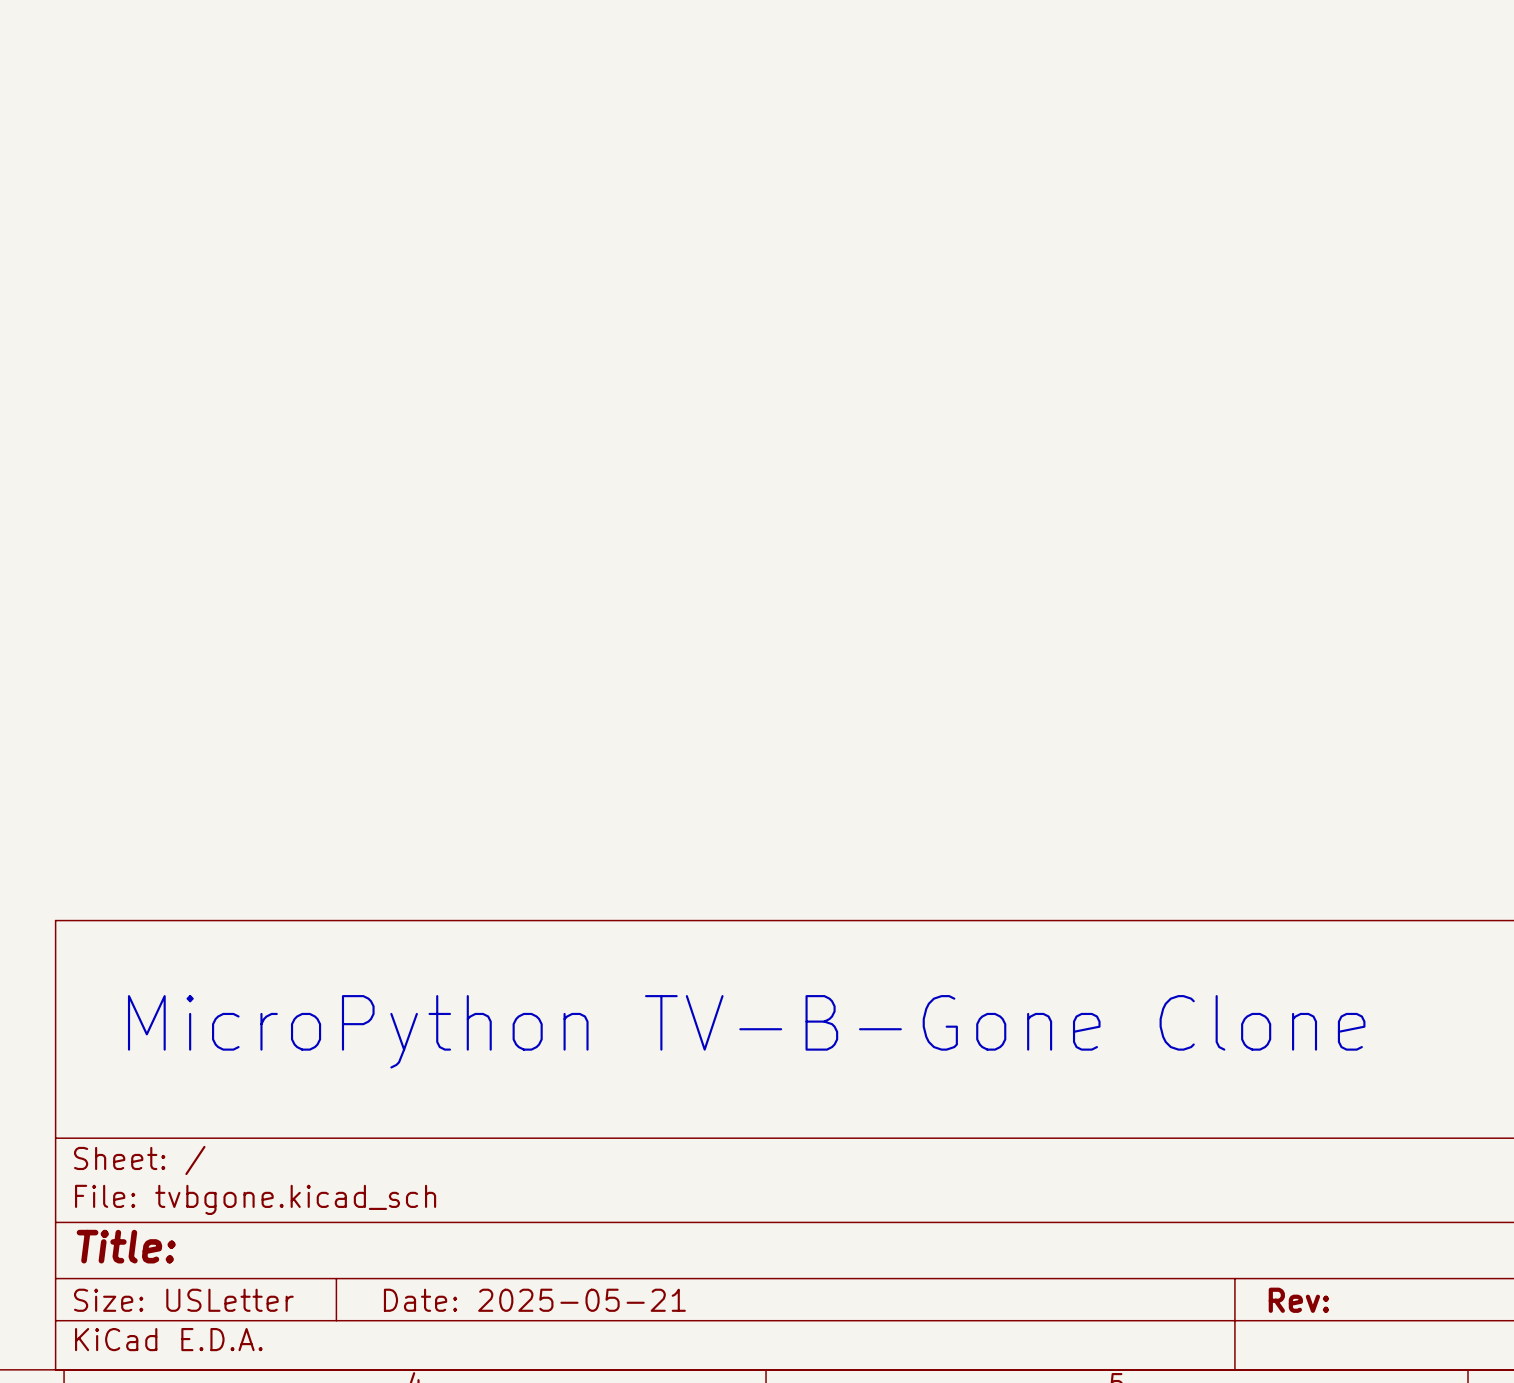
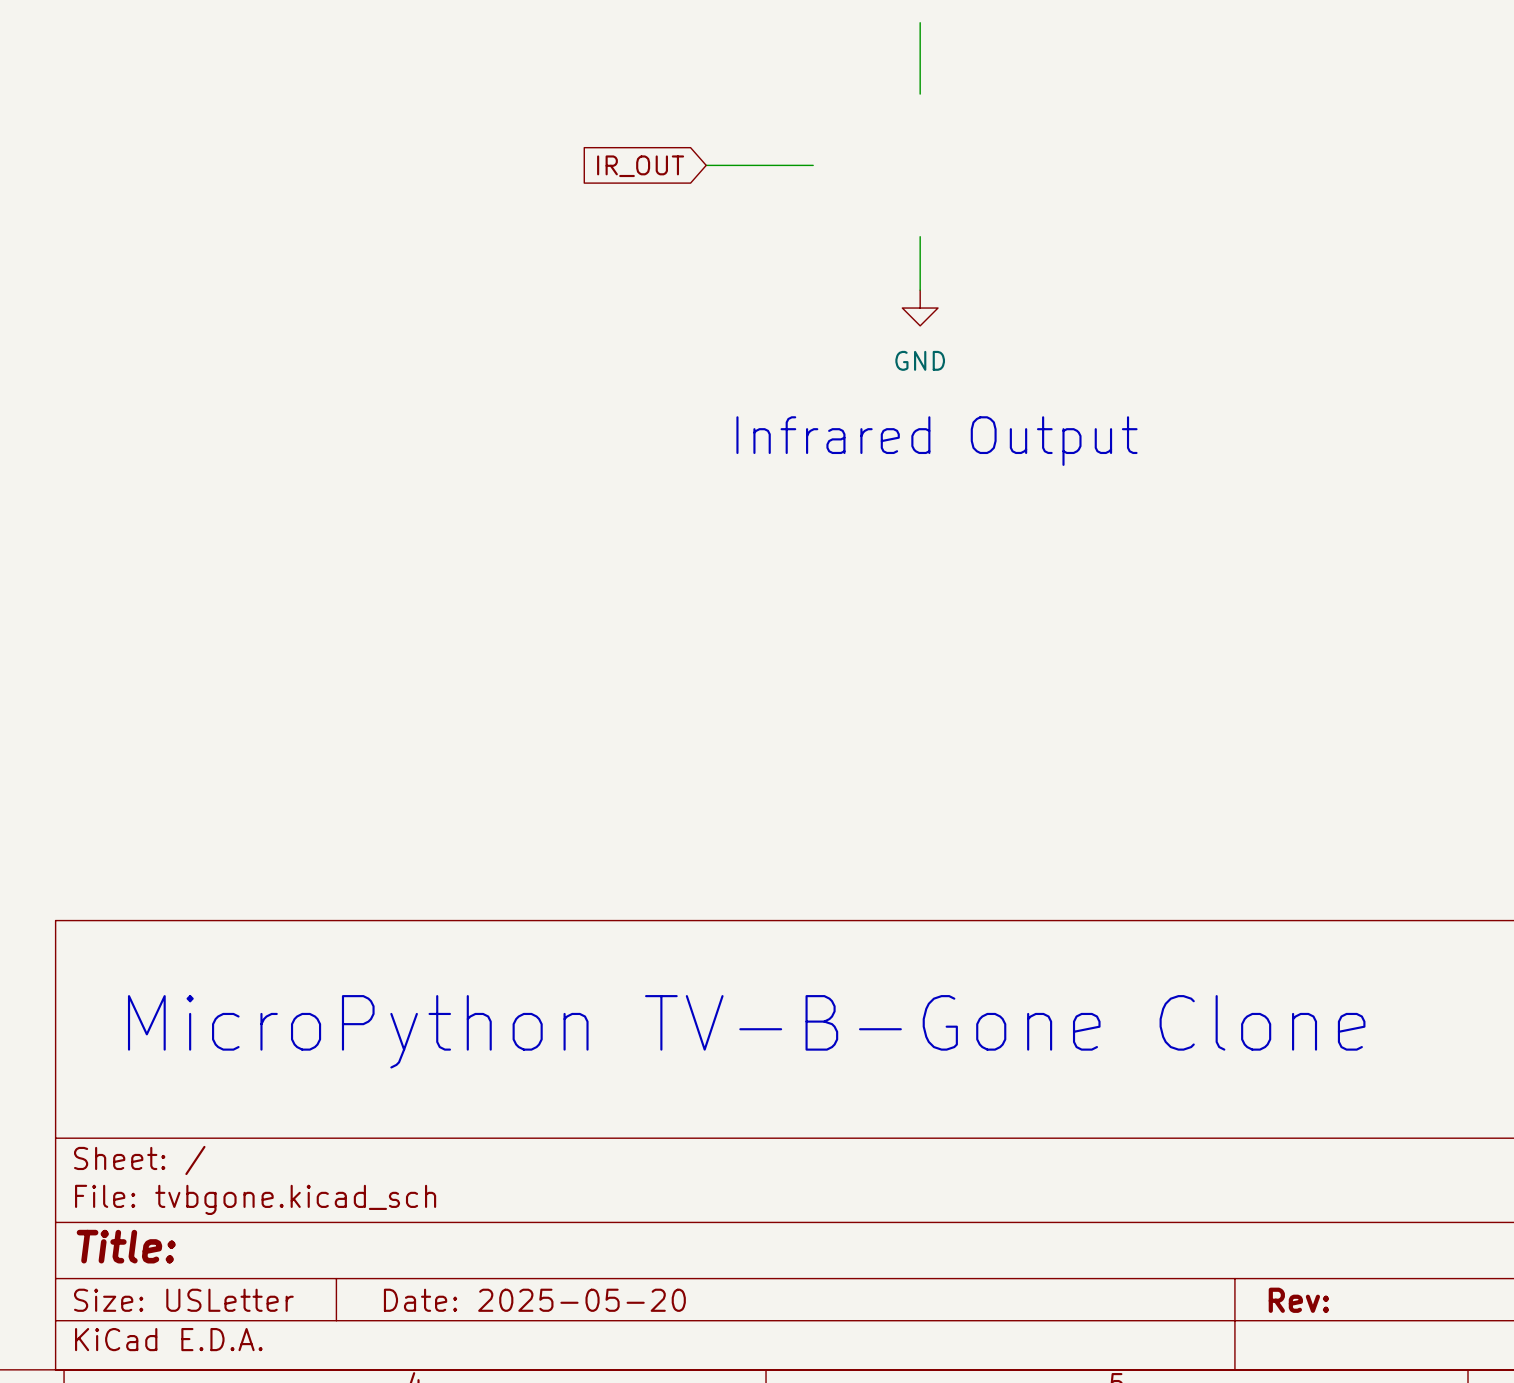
wire: none -> (920, 22) (920, 94)
wire: none -> (706, 165) (813, 165)
global label: none -> IR_OUT (640, 166)
wire: none -> (920, 236) (920, 290)
power symbol: none -> GND (920, 308)
text: none -> Infrared Output (936, 441)
title block: Date: 2025-05-21 (534, 1300) -> Date: 2025-05-20 (534, 1300)

